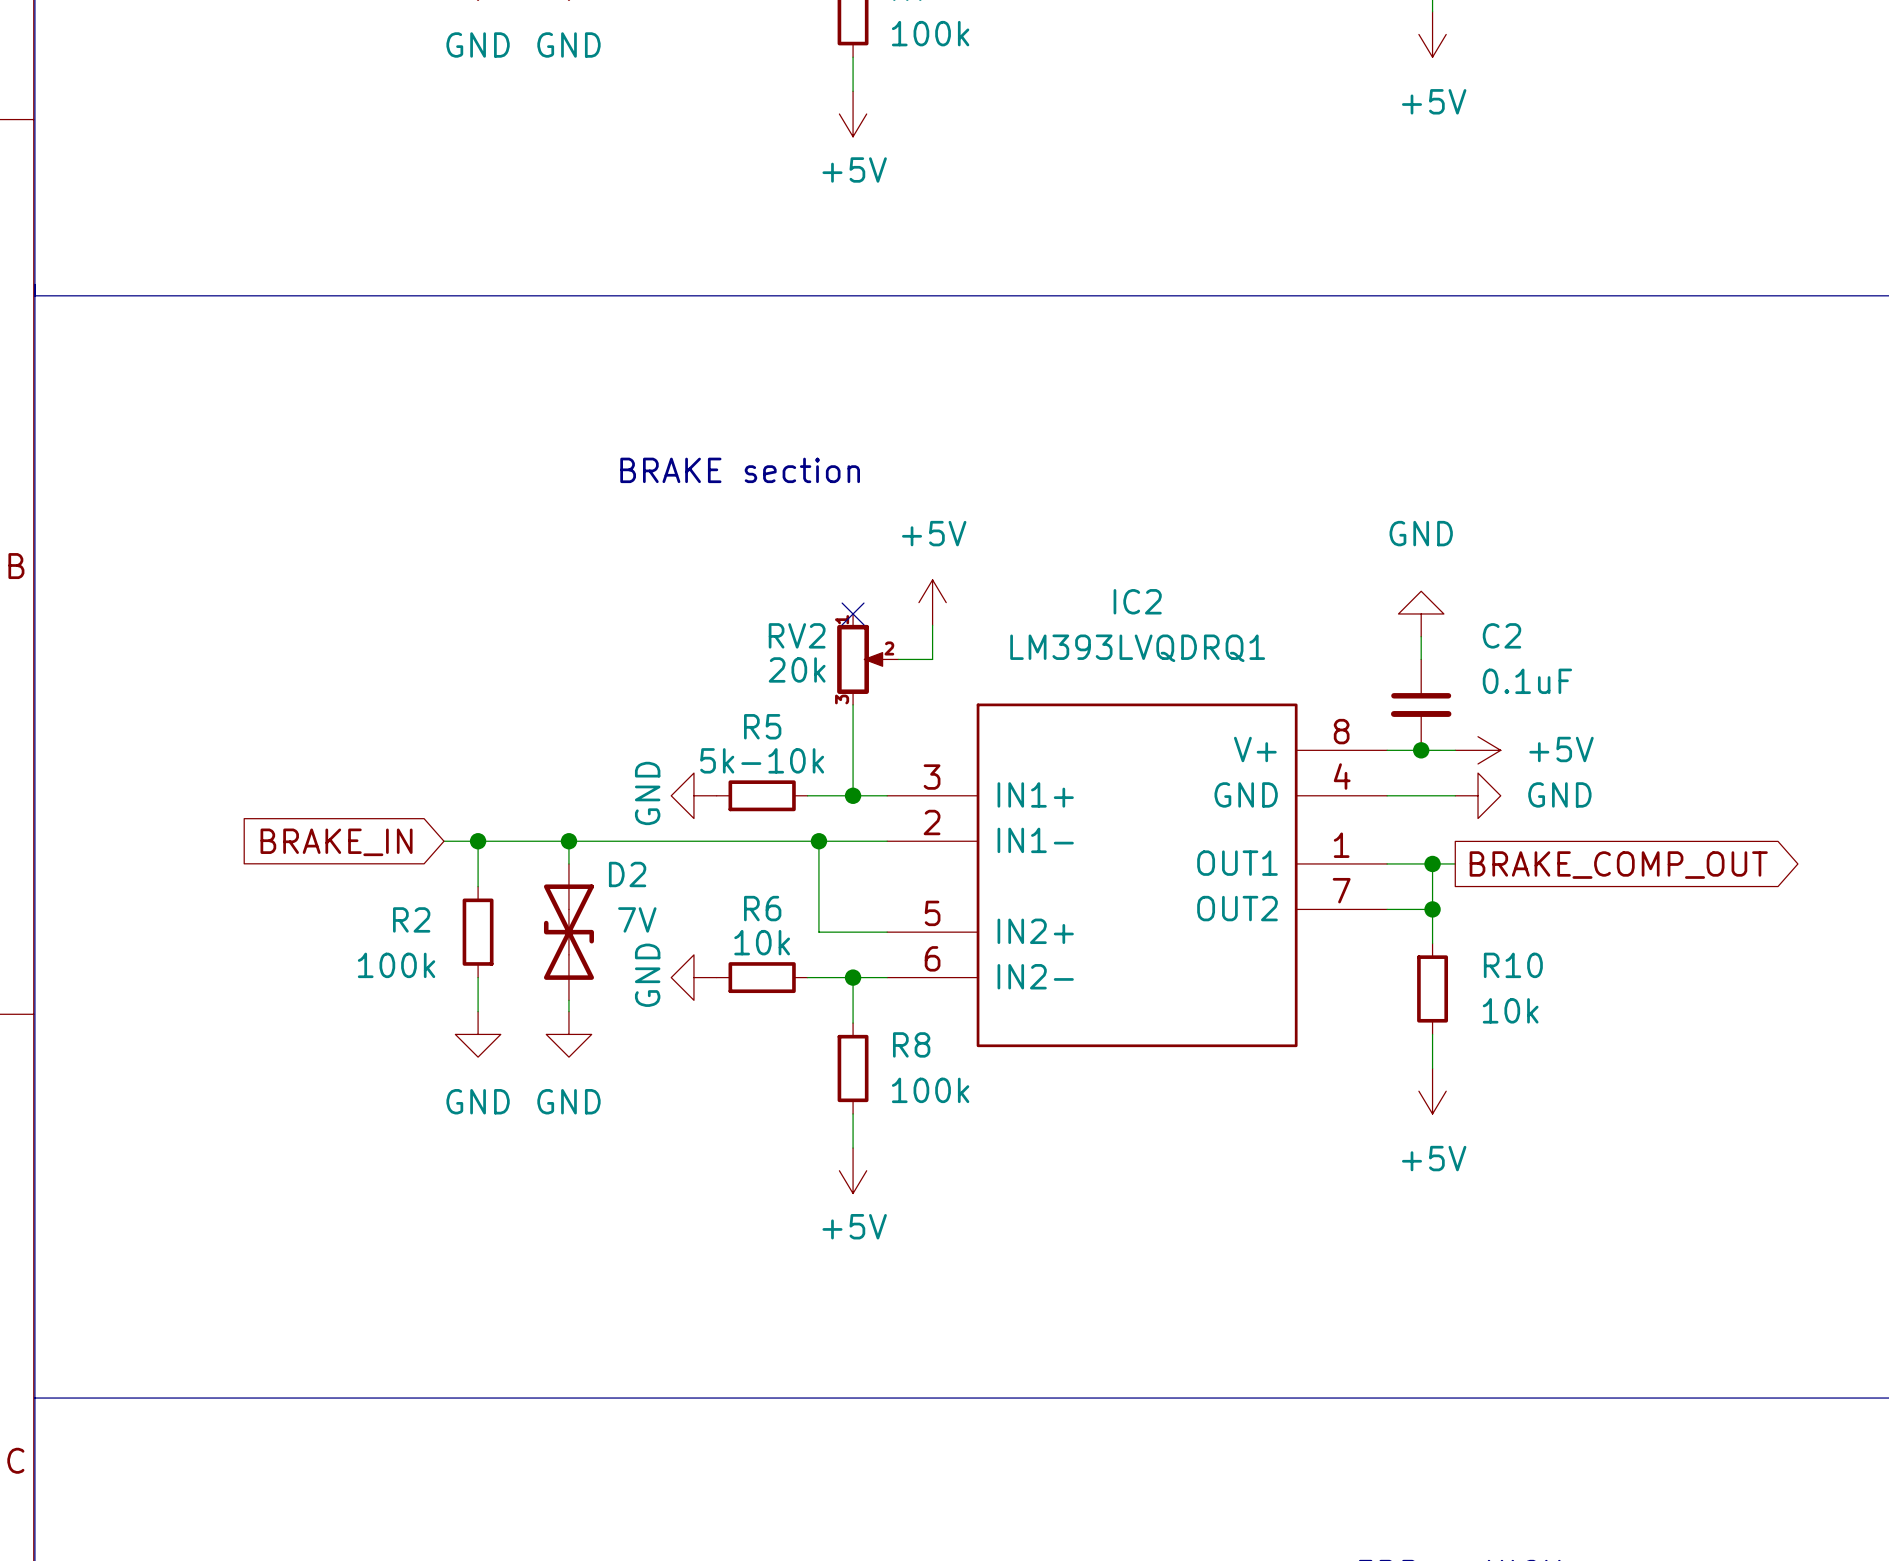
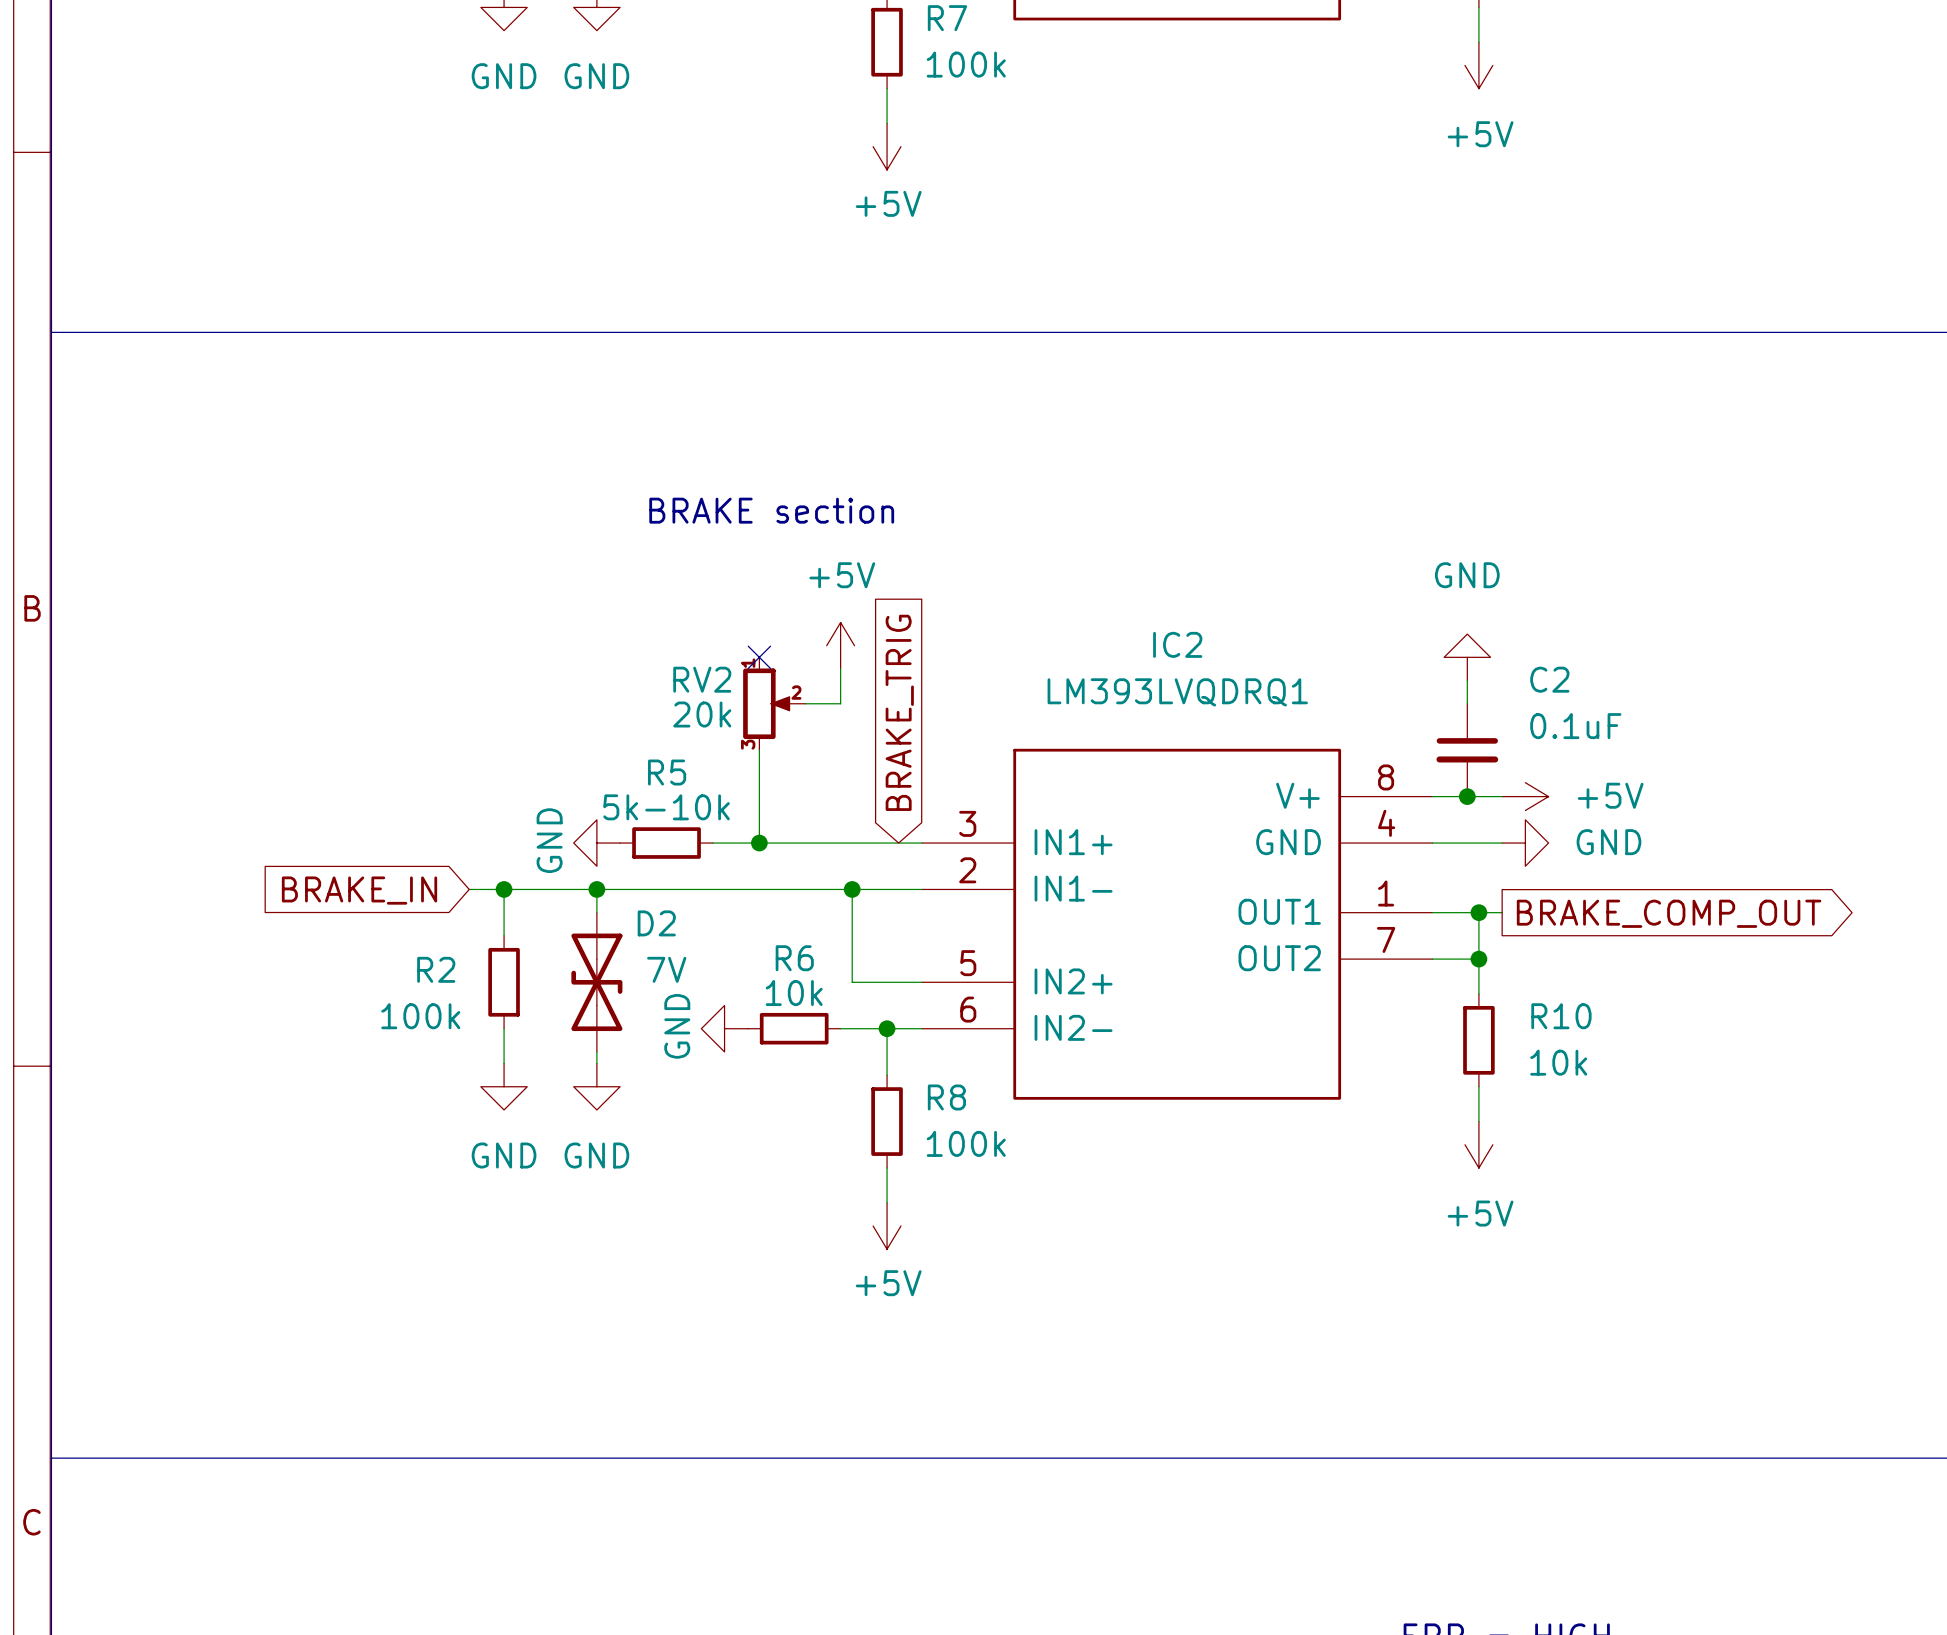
power symbol position: +5V (932, 602) -> +5V (840, 645)
no-connect mark: none -> (759, 657)
no-connect mark: (853, 613) -> none
wire: (932, 625) (932, 659) (898, 659) -> (840, 668) (840, 703) (805, 703)
RV2 position: (867, 659) -> (774, 703)
global label: none -> BRAKE_TRIG (899, 712)
wire: (853, 704) (853, 795) -> (759, 750) (759, 843)
wire: none -> (712, 843) (840, 843)
power symbol position: GND (693, 795) -> GND (596, 843)
junction: none -> (759, 843)
R5 position: (762, 795) -> (666, 843)
junction: (853, 795) -> none

